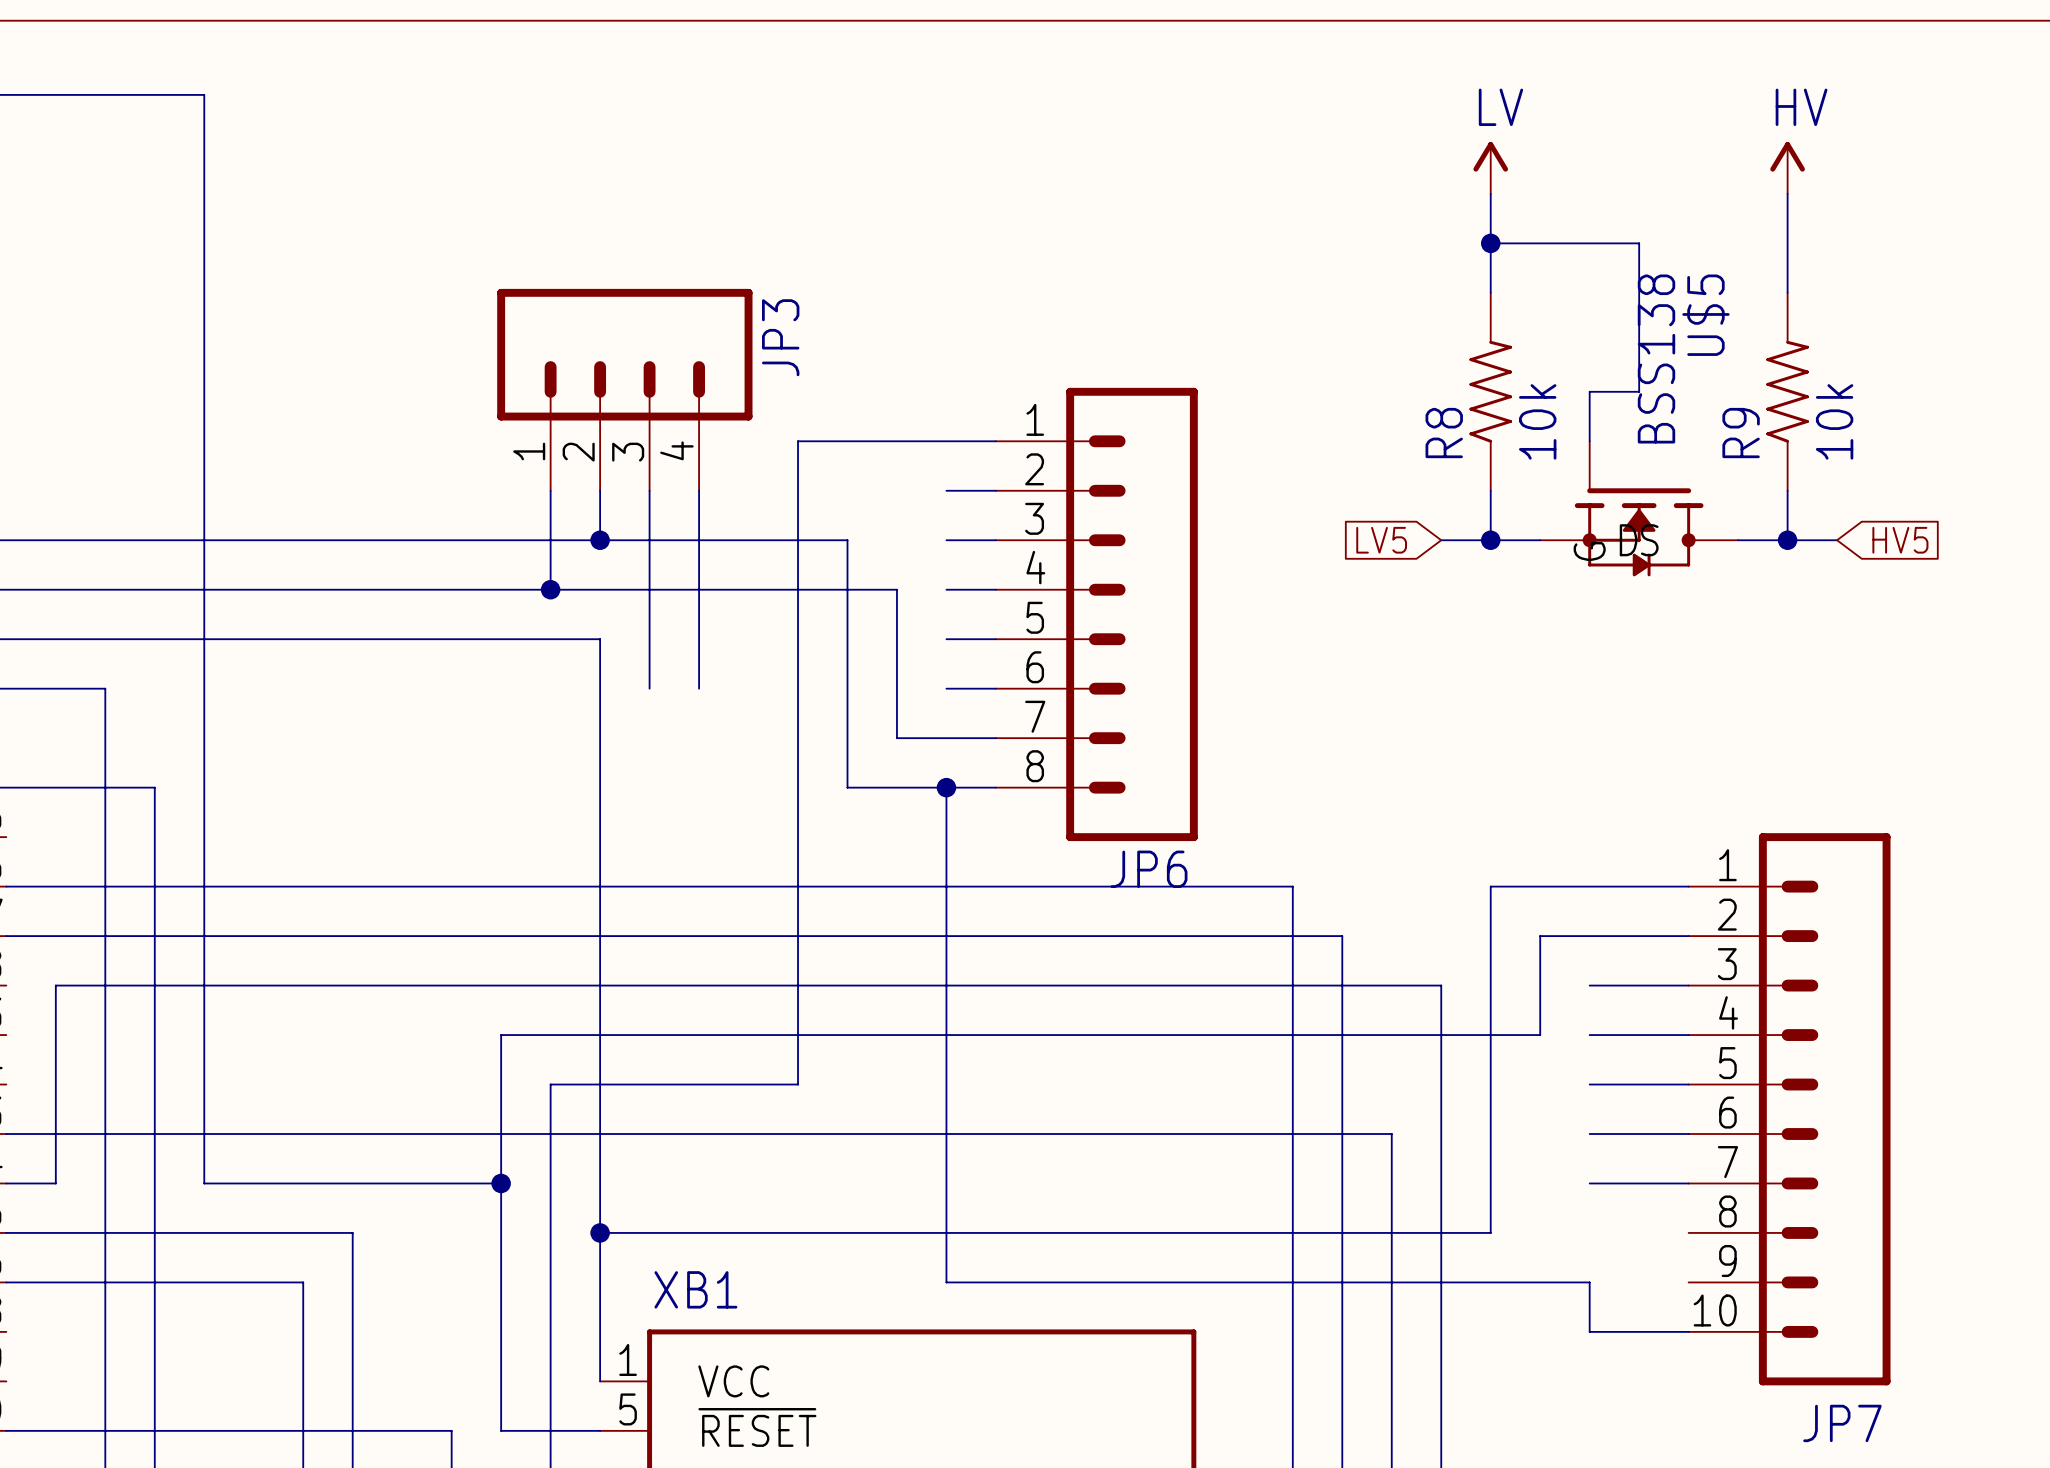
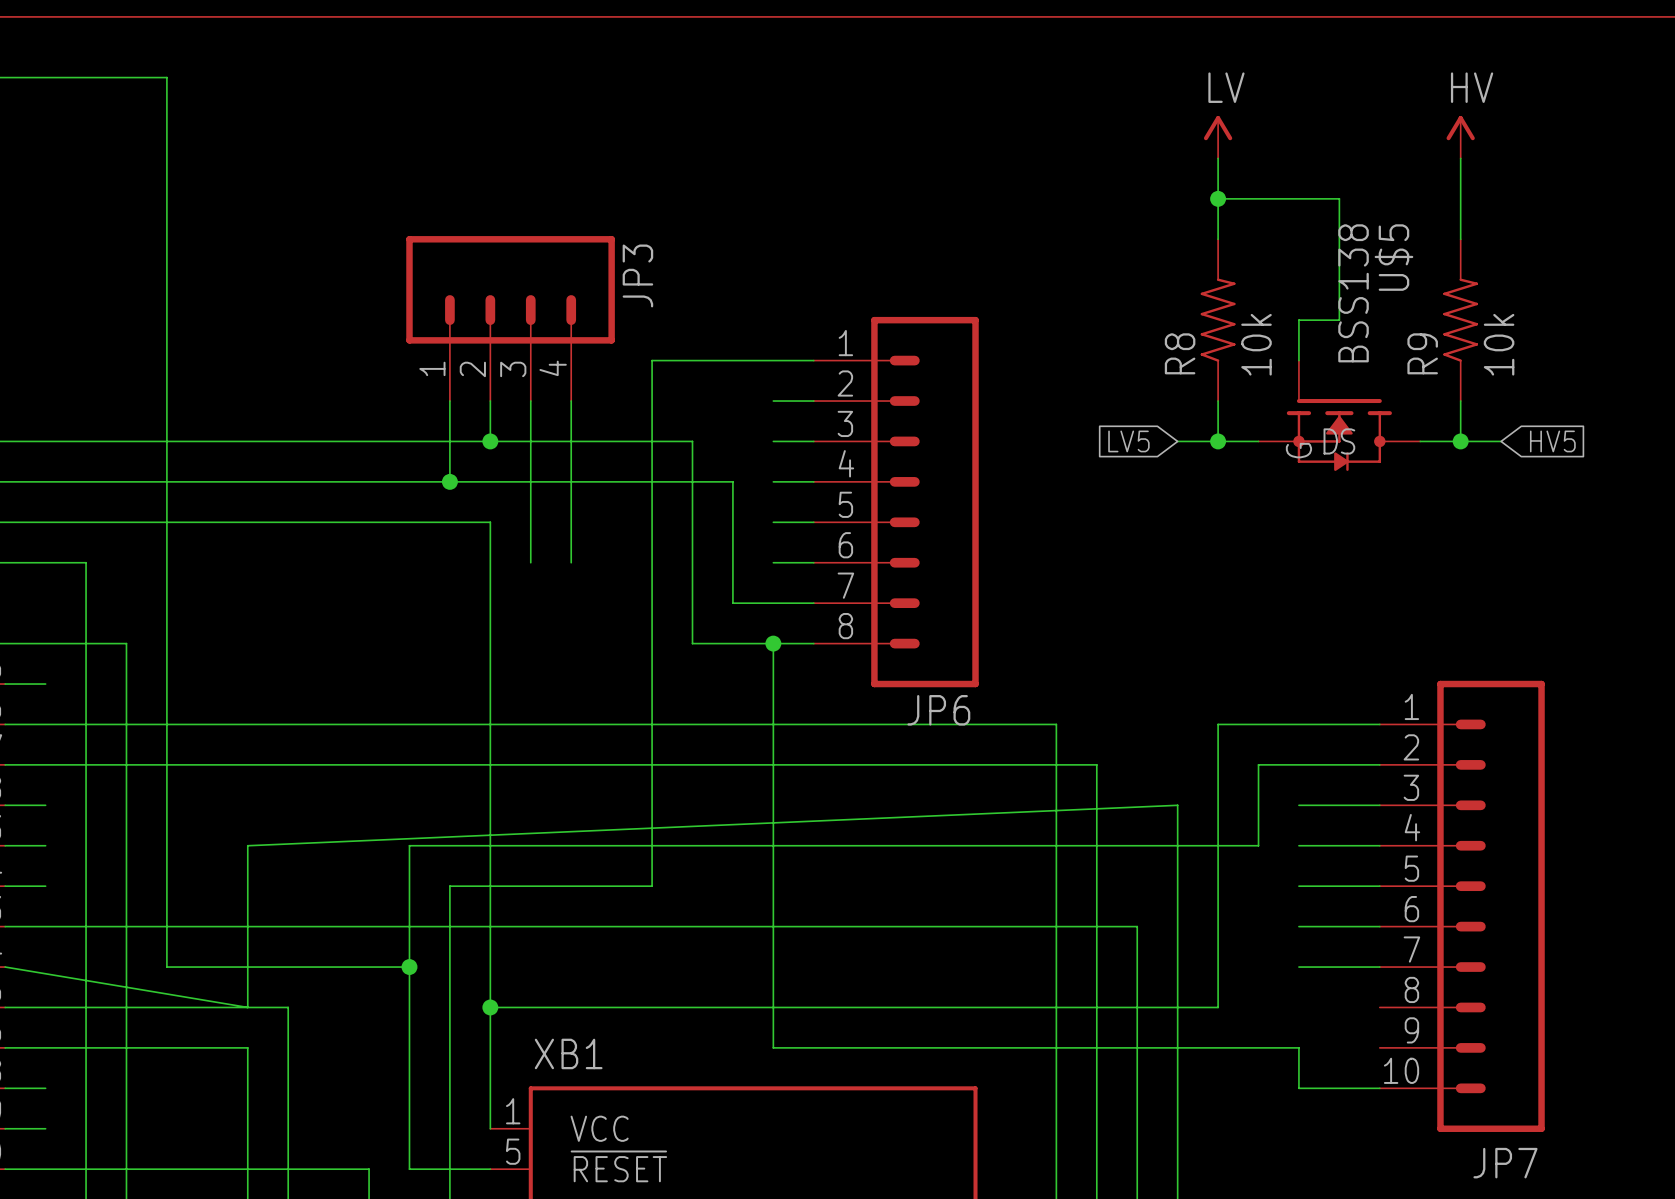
wire: none -> (5, 684) (45, 684)
wire: none -> (5, 805) (45, 805)
wire: (1441, 985) (55, 985) (55, 1183) (6, 1183) -> (1177, 805) (247, 845) (247, 1007) (5, 967)
wire: none -> (5, 845) (45, 845)
wire: none -> (5, 886) (45, 886)
wire: none -> (5, 1088) (45, 1088)
wire: none -> (5, 1128) (45, 1128)

